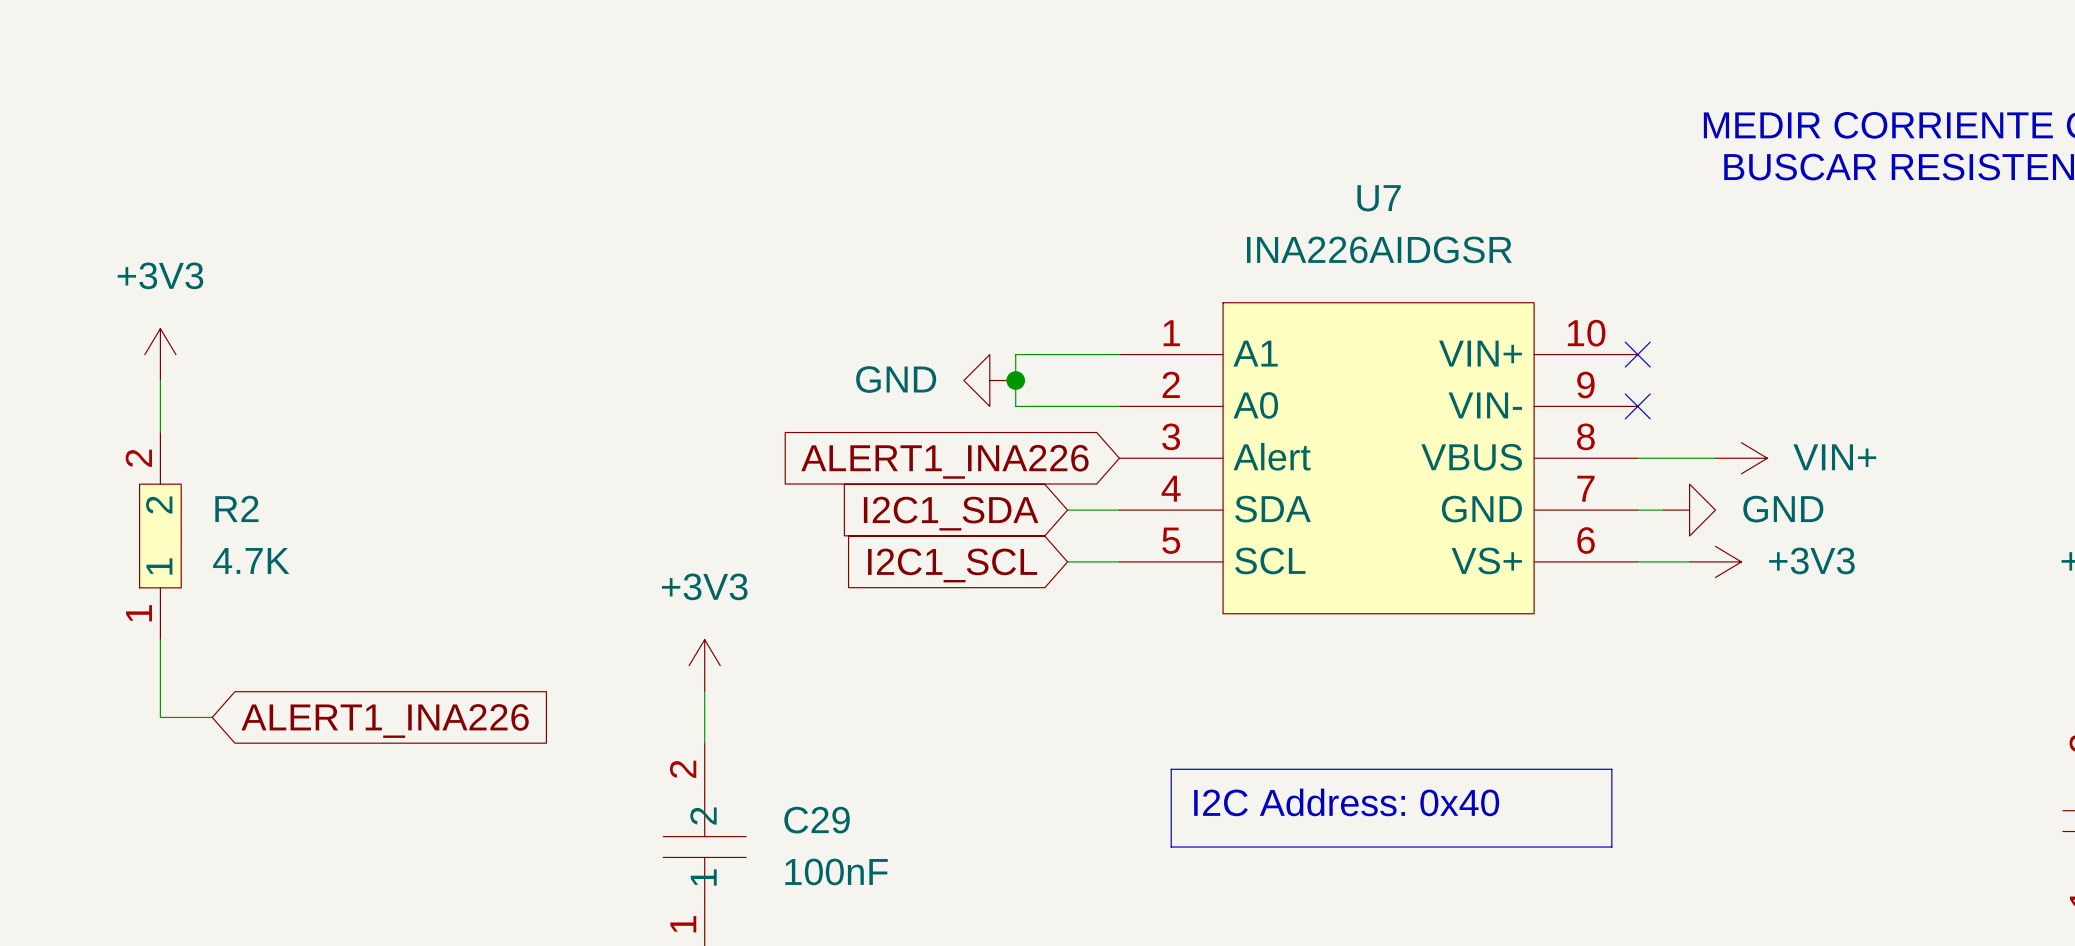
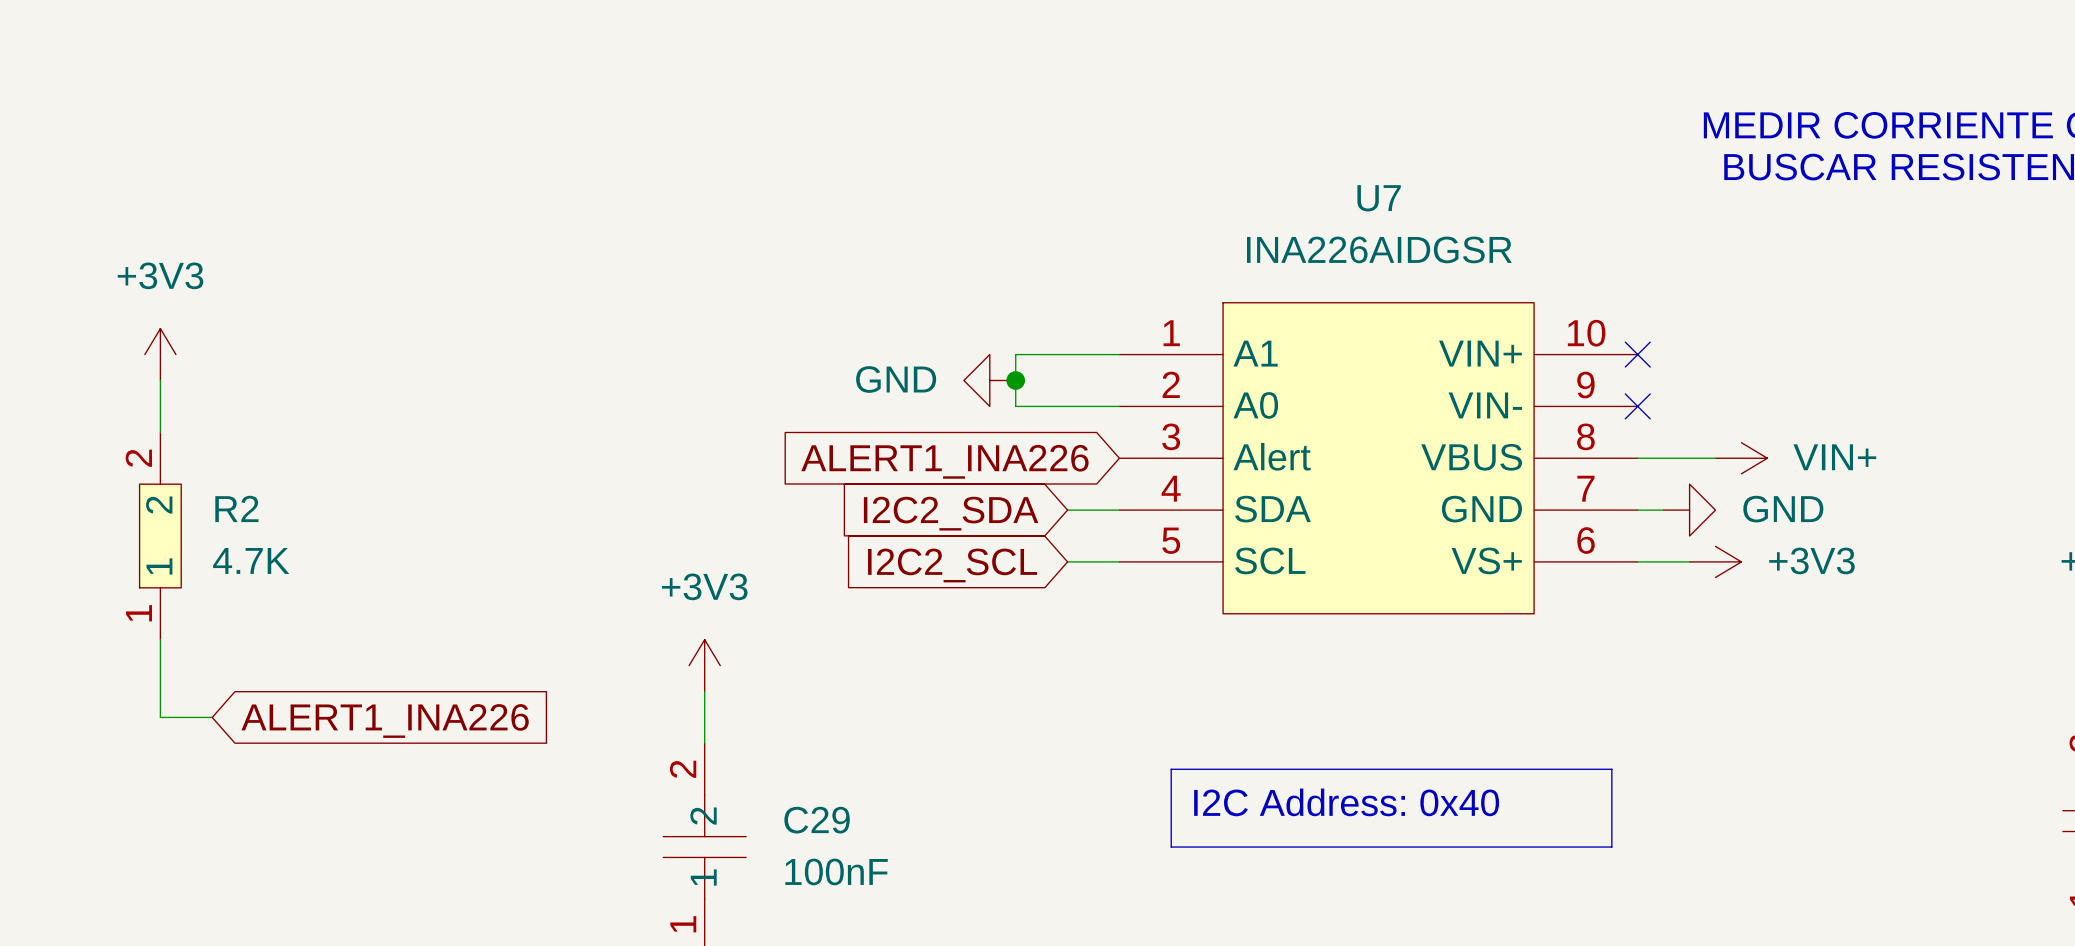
global label: I2C1_SDA (951, 513) -> I2C2_SDA (951, 513)
global label: I2C1_SCL (952, 565) -> I2C2_SCL (952, 565)

